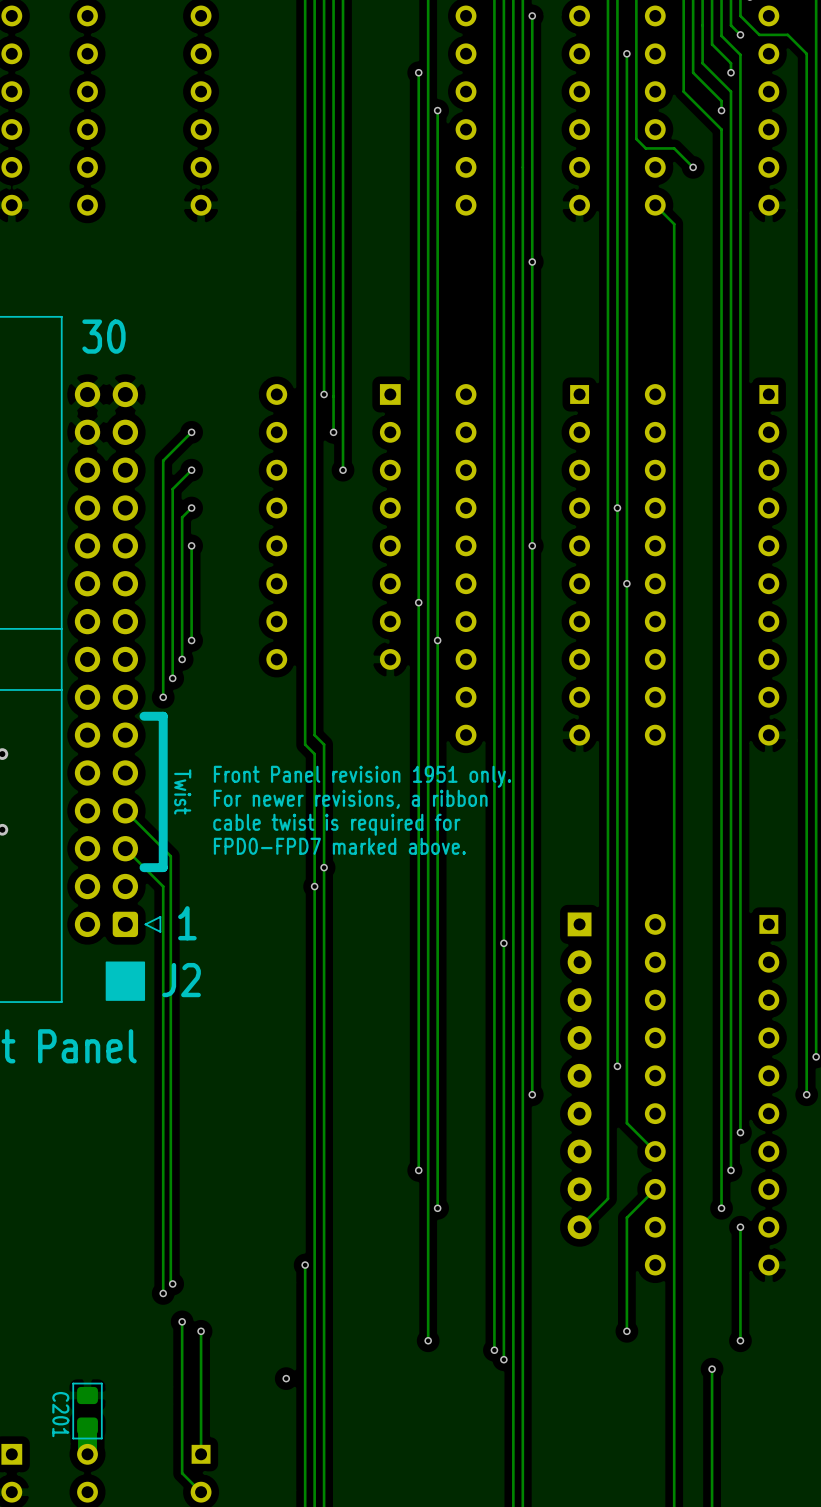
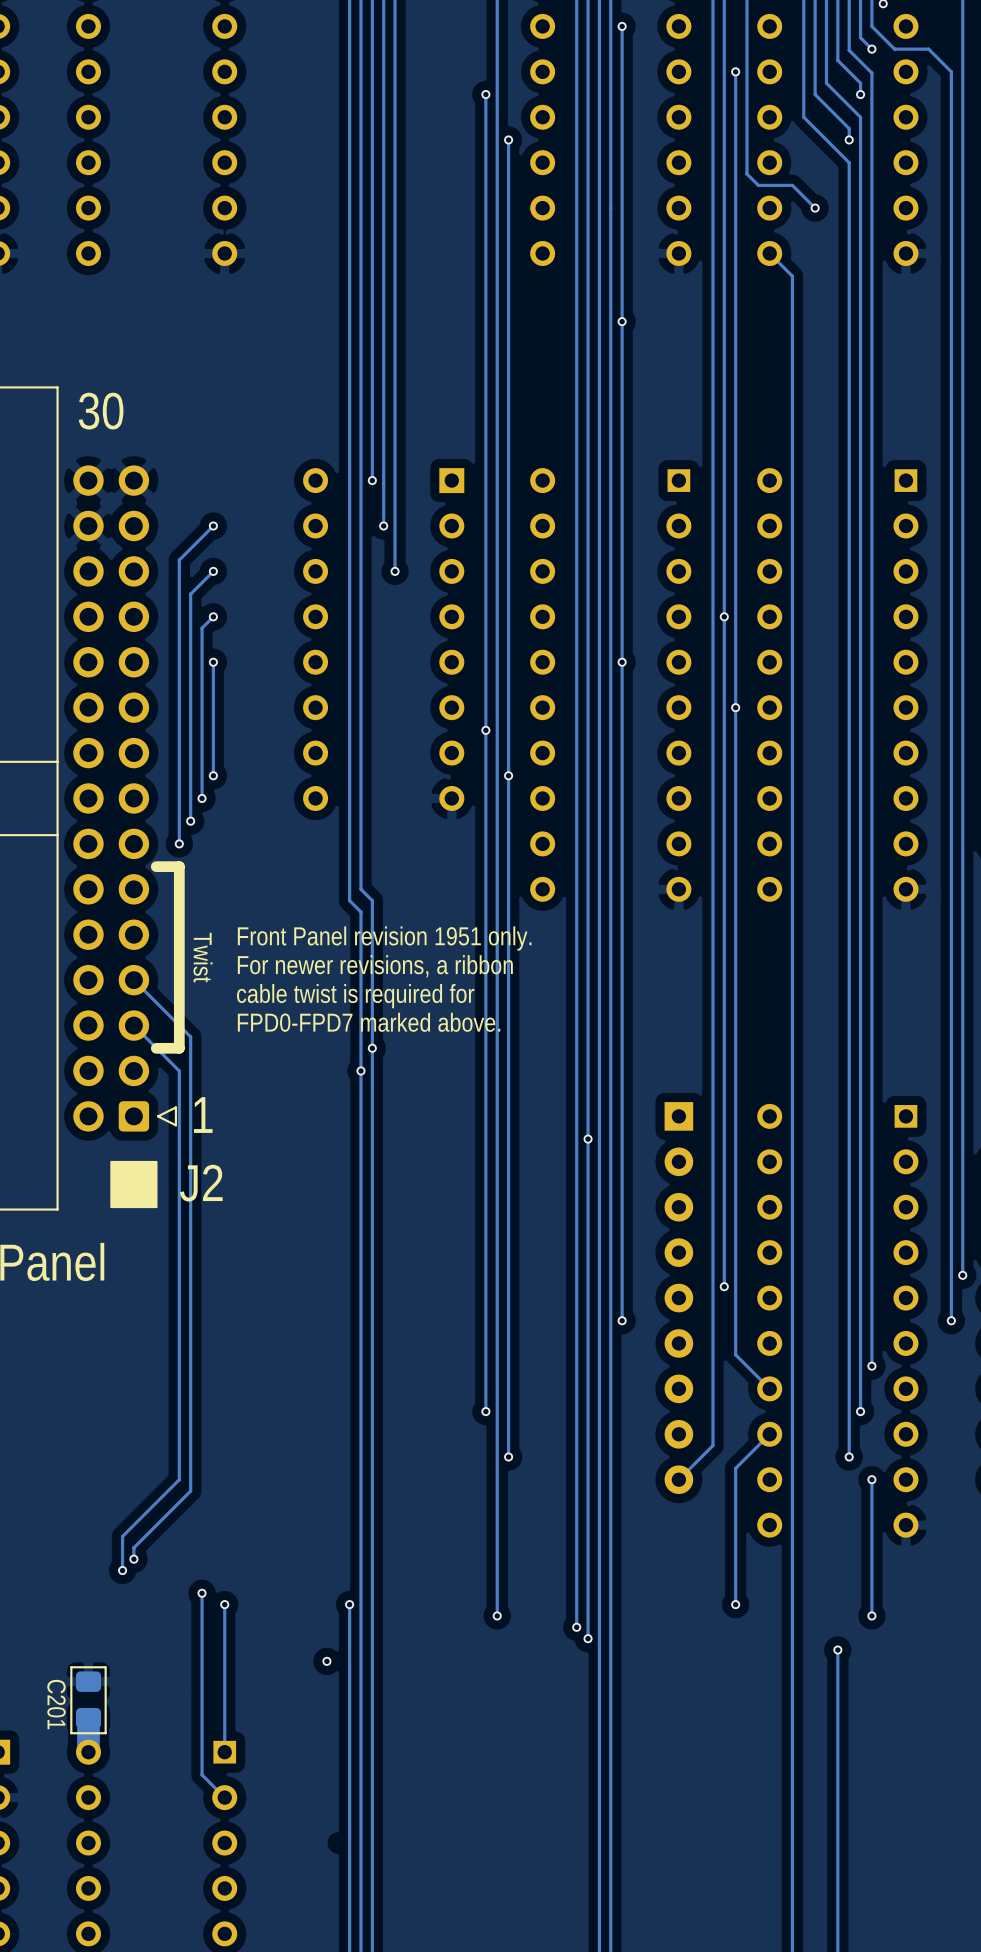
track: (170, 856) (170, 1282) (172, 1283) -> (188, 1034) (190, 1036) (190, 1491) (133, 1547) (133, 1559)
track: (163, 1227) (163, 1293) -> (179, 1479) (122, 1536) (122, 1570)
track: (305, 1265) (305, 1331) -> none
via position: (305, 1265) -> (349, 1604)
via: (172, 1283) -> none
via: none -> (133, 1559)
via: (163, 1293) -> none
via: none -> (122, 1570)

